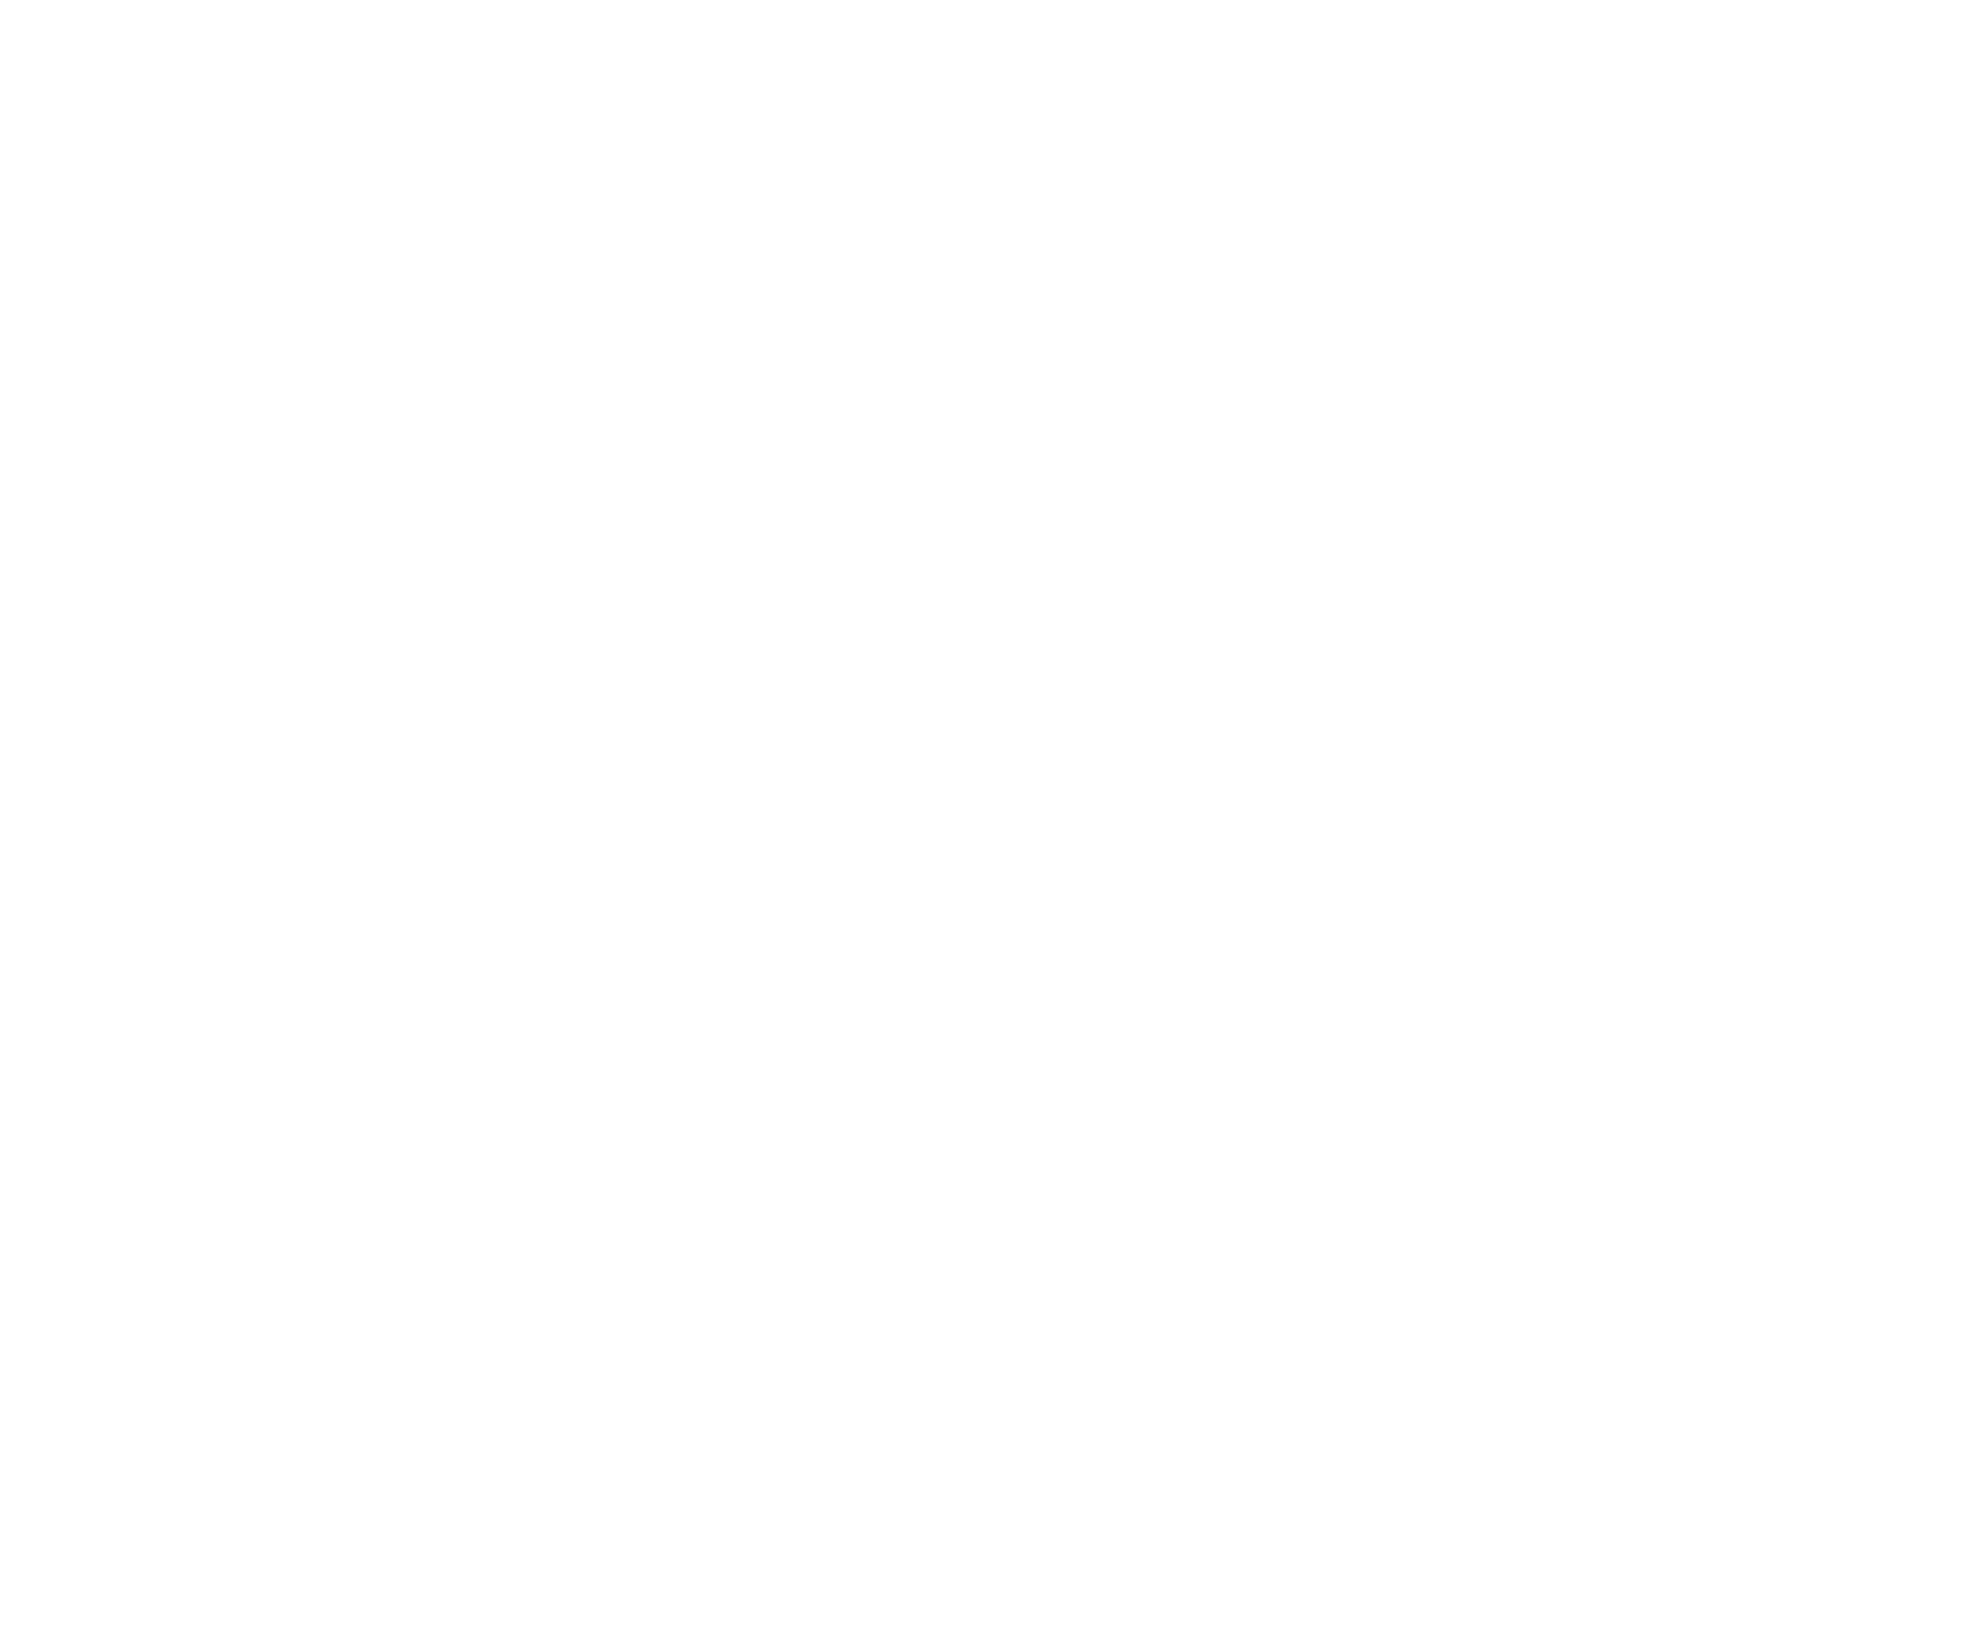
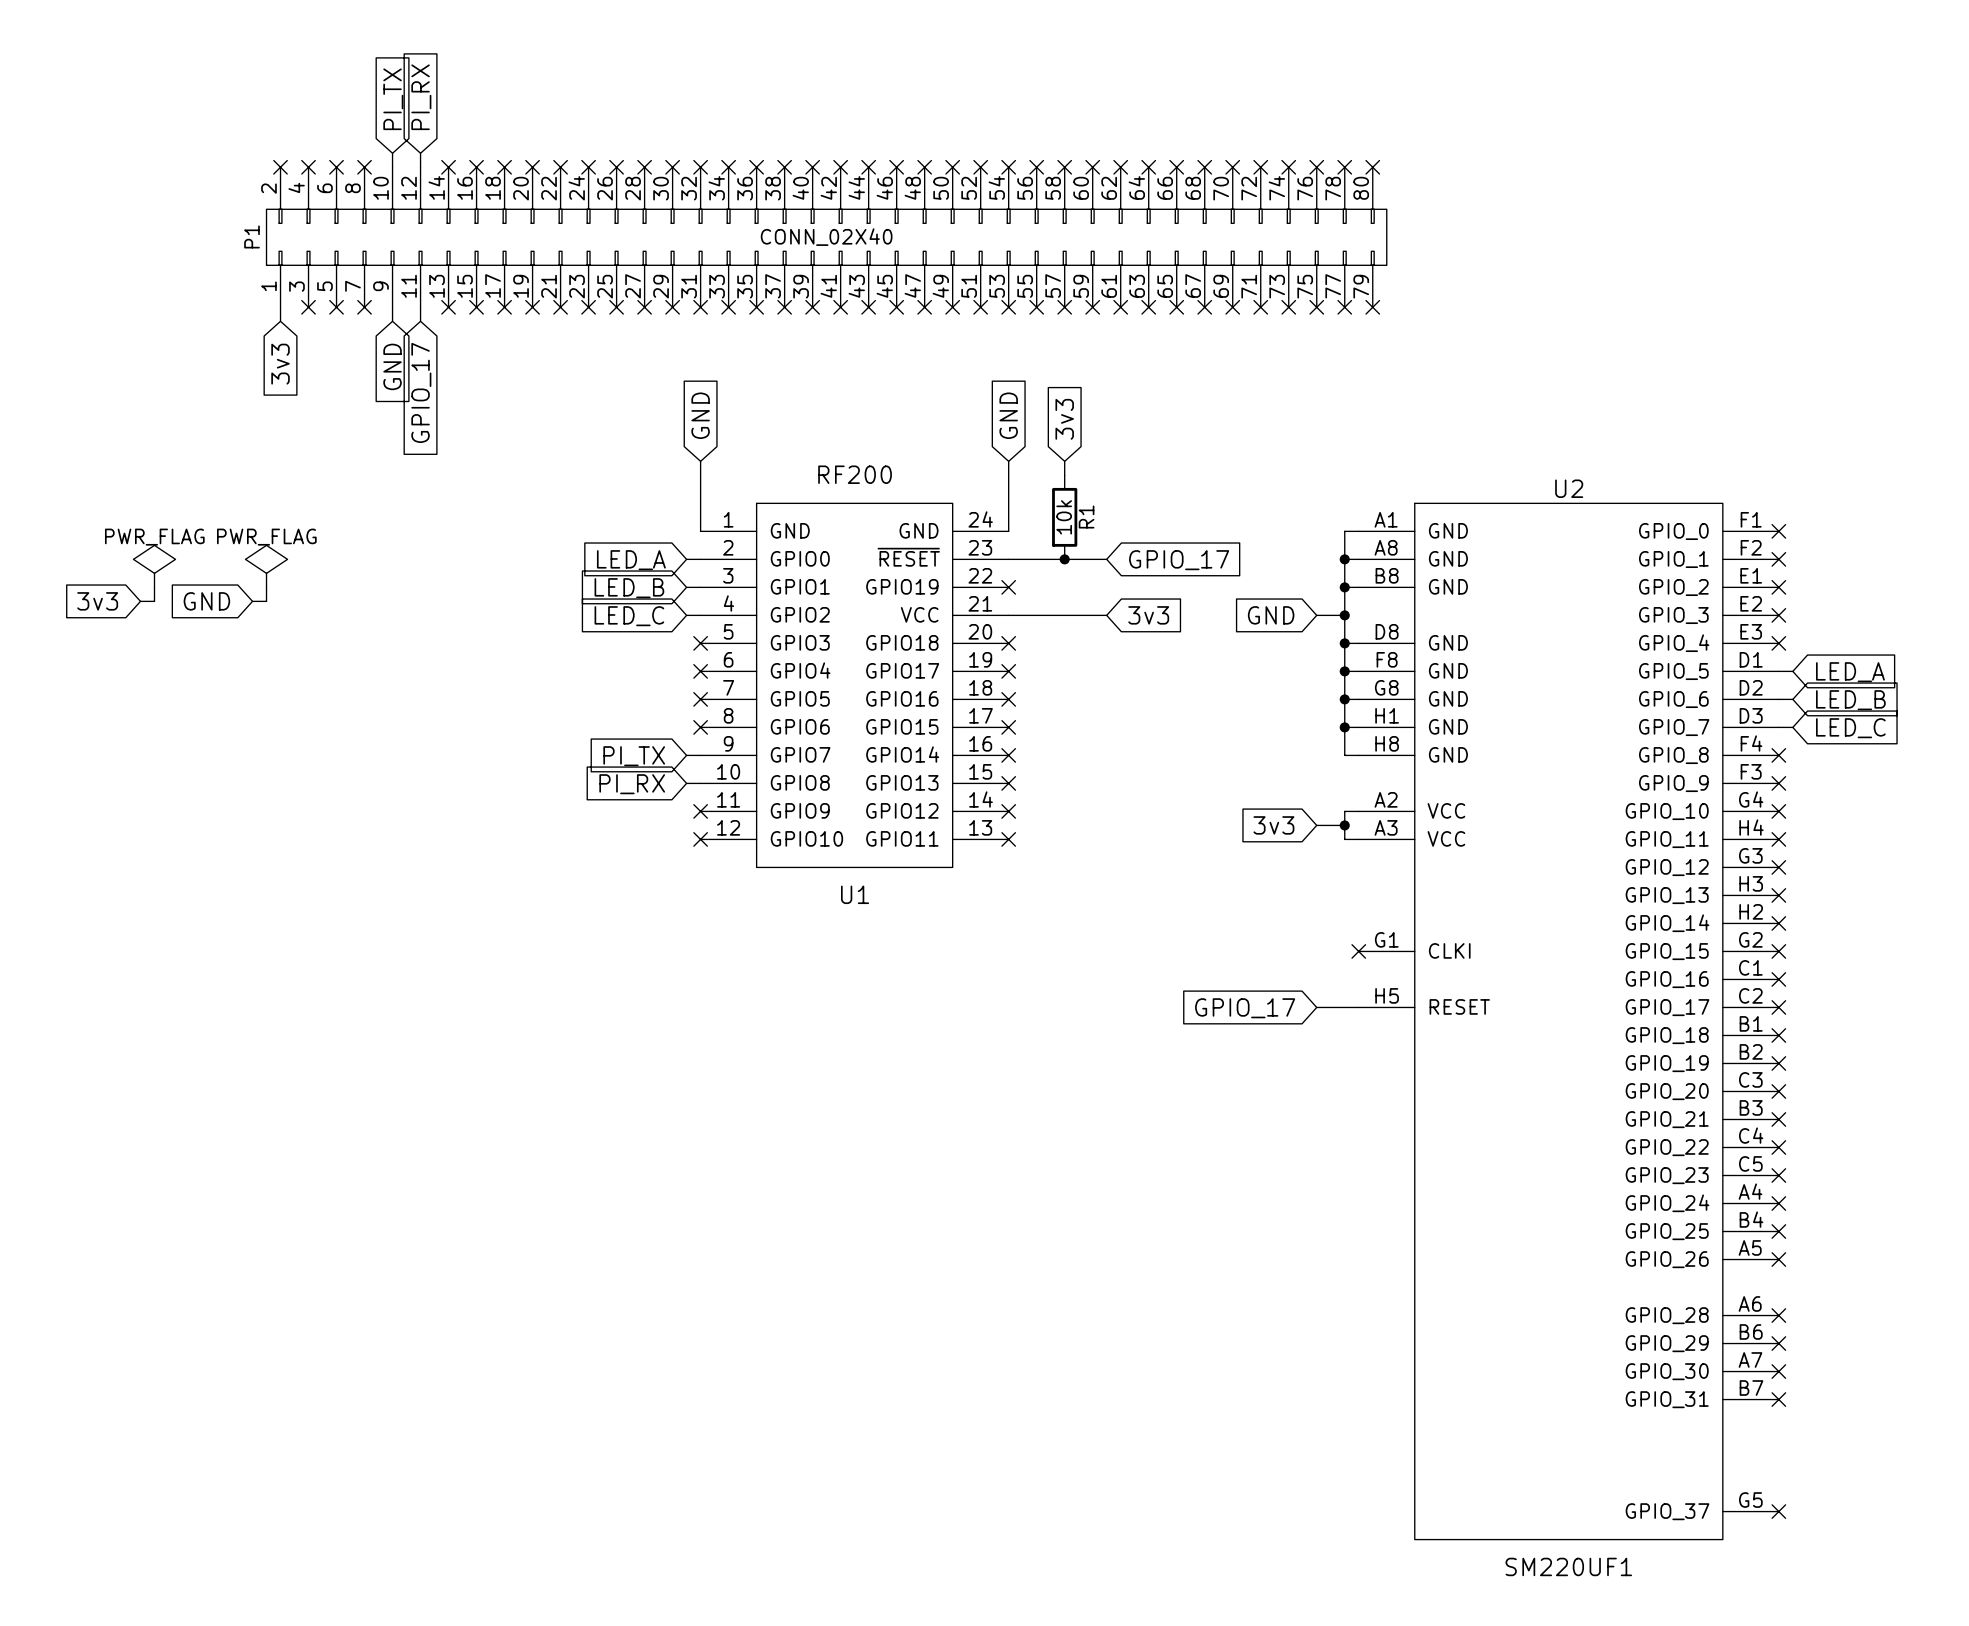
global label: none -> PI_RX (421, 97)
global label: none -> PI_TX (393, 99)
wire: none -> (392, 153) (392, 167)
wire: none -> (420, 153) (420, 167)
no-connect mark: none -> (280, 167)
no-connect mark: none -> (308, 167)
no-connect mark: none -> (336, 167)
no-connect mark: none -> (364, 167)
no-connect mark: none -> (448, 167)
no-connect mark: none -> (476, 167)
no-connect mark: none -> (504, 167)
no-connect mark: none -> (532, 167)
no-connect mark: none -> (560, 167)
no-connect mark: none -> (588, 167)
no-connect mark: none -> (616, 167)
no-connect mark: none -> (644, 167)
no-connect mark: none -> (672, 167)
no-connect mark: none -> (700, 167)
no-connect mark: none -> (728, 167)
no-connect mark: none -> (756, 167)
no-connect mark: none -> (784, 167)
no-connect mark: none -> (812, 167)
no-connect mark: none -> (840, 167)
no-connect mark: none -> (868, 167)
no-connect mark: none -> (896, 167)
no-connect mark: none -> (924, 167)
no-connect mark: none -> (952, 167)
no-connect mark: none -> (980, 167)
no-connect mark: none -> (1008, 167)
no-connect mark: none -> (1036, 167)
no-connect mark: none -> (1064, 167)
no-connect mark: none -> (1092, 167)
no-connect mark: none -> (1120, 167)
no-connect mark: none -> (1148, 167)
no-connect mark: none -> (1176, 167)
no-connect mark: none -> (1204, 167)
no-connect mark: none -> (1232, 167)
no-connect mark: none -> (1260, 167)
no-connect mark: none -> (1288, 167)
no-connect mark: none -> (1316, 167)
no-connect mark: none -> (1344, 167)
no-connect mark: none -> (1372, 167)
P1: none -> CONN_02X40 (826, 237)
wire: none -> (280, 307) (280, 321)
no-connect mark: none -> (308, 307)
no-connect mark: none -> (336, 307)
no-connect mark: none -> (364, 307)
wire: none -> (392, 307) (392, 321)
wire: none -> (420, 307) (420, 321)
no-connect mark: none -> (448, 307)
no-connect mark: none -> (476, 307)
no-connect mark: none -> (504, 307)
no-connect mark: none -> (532, 307)
no-connect mark: none -> (560, 307)
no-connect mark: none -> (588, 307)
no-connect mark: none -> (616, 307)
no-connect mark: none -> (644, 307)
no-connect mark: none -> (672, 307)
no-connect mark: none -> (700, 307)
no-connect mark: none -> (728, 307)
no-connect mark: none -> (756, 307)
no-connect mark: none -> (784, 307)
no-connect mark: none -> (812, 307)
no-connect mark: none -> (840, 307)
no-connect mark: none -> (868, 307)
no-connect mark: none -> (896, 307)
no-connect mark: none -> (924, 307)
no-connect mark: none -> (952, 307)
no-connect mark: none -> (980, 307)
no-connect mark: none -> (1008, 307)
no-connect mark: none -> (1036, 307)
no-connect mark: none -> (1064, 307)
no-connect mark: none -> (1092, 307)
no-connect mark: none -> (1120, 307)
no-connect mark: none -> (1148, 307)
no-connect mark: none -> (1176, 307)
no-connect mark: none -> (1204, 307)
no-connect mark: none -> (1232, 307)
no-connect mark: none -> (1260, 307)
no-connect mark: none -> (1288, 307)
no-connect mark: none -> (1316, 307)
no-connect mark: none -> (1344, 307)
no-connect mark: none -> (1372, 307)
global label: none -> 3v3 (280, 364)
global label: none -> GND (392, 366)
global label: none -> GPIO_17 (421, 392)
global label: none -> GND (700, 415)
global label: none -> GND (1008, 415)
global label: none -> 3v3 (1064, 419)
wire: none -> (700, 461) (700, 531)
wire: none -> (1008, 461) (1008, 531)
wire: none -> (1064, 461) (1064, 475)
R1: none -> 10k (1064, 517)
wire: none -> (1358, 531) (1344, 531) (1344, 755) (1358, 755)
no-connect mark: none -> (1778, 531)
wire: none -> (686, 559) (700, 559)
wire: none -> (1008, 559) (1106, 559)
junction: none -> (1064, 559)
wire: none -> (1344, 559) (1358, 559)
junction: none -> (1344, 559)
no-connect mark: none -> (1778, 559)
global label: none -> LED_A (631, 560)
global label: none -> GPIO_17 (1179, 560)
power symbol: none -> PWR_FLAG (154, 566)
power symbol: none -> PWR_FLAG (266, 566)
wire: none -> (154, 587) (154, 601) (140, 601)
wire: none -> (266, 587) (266, 601) (252, 601)
wire: none -> (686, 587) (700, 587)
no-connect mark: none -> (1008, 587)
wire: none -> (1344, 587) (1358, 587)
junction: none -> (1344, 587)
no-connect mark: none -> (1778, 587)
global label: none -> LED_B (629, 588)
global label: none -> 3v3 (97, 601)
global label: none -> GND (206, 601)
wire: none -> (686, 615) (700, 615)
wire: none -> (1008, 615) (1106, 615)
global label: none -> 3v3 (1148, 615)
global label: none -> GND (1271, 615)
wire: none -> (1316, 615) (1344, 615)
junction: none -> (1344, 615)
no-connect mark: none -> (1778, 615)
global label: none -> LED_C (629, 616)
no-connect mark: none -> (700, 643)
no-connect mark: none -> (1008, 643)
wire: none -> (1344, 643) (1358, 643)
junction: none -> (1344, 643)
no-connect mark: none -> (1778, 643)
no-connect mark: none -> (700, 671)
no-connect mark: none -> (1008, 671)
wire: none -> (1344, 671) (1358, 671)
junction: none -> (1344, 671)
wire: none -> (1778, 671) (1792, 671)
global label: none -> LED_A (1850, 672)
U1: none -> RF200 (854, 685)
no-connect mark: none -> (700, 699)
no-connect mark: none -> (1008, 699)
wire: none -> (1344, 699) (1358, 699)
junction: none -> (1344, 699)
wire: none -> (1778, 699) (1792, 699)
global label: none -> LED_B (1850, 700)
no-connect mark: none -> (700, 727)
no-connect mark: none -> (1008, 727)
wire: none -> (1344, 727) (1358, 727)
junction: none -> (1344, 727)
wire: none -> (1778, 727) (1792, 727)
global label: none -> LED_C (1850, 728)
wire: none -> (686, 755) (700, 755)
no-connect mark: none -> (1008, 755)
no-connect mark: none -> (1778, 755)
global label: none -> PI_TX (634, 756)
wire: none -> (686, 783) (700, 783)
no-connect mark: none -> (1008, 783)
no-connect mark: none -> (1778, 783)
global label: none -> PI_RX (632, 784)
no-connect mark: none -> (700, 811)
no-connect mark: none -> (1008, 811)
wire: none -> (1358, 811) (1344, 811) (1344, 839) (1358, 839)
no-connect mark: none -> (1778, 811)
global label: none -> 3v3 (1273, 825)
wire: none -> (1316, 825) (1344, 825)
junction: none -> (1344, 825)
no-connect mark: none -> (700, 839)
no-connect mark: none -> (1008, 839)
no-connect mark: none -> (1778, 839)
no-connect mark: none -> (1778, 867)
no-connect mark: none -> (1778, 895)
no-connect mark: none -> (1778, 923)
no-connect mark: none -> (1358, 951)
no-connect mark: none -> (1778, 951)
no-connect mark: none -> (1778, 979)
wire: none -> (1316, 1007) (1358, 1007)
no-connect mark: none -> (1778, 1007)
global label: none -> GPIO_17 (1245, 1008)
U2: none -> SM220UF1 (1568, 1021)
no-connect mark: none -> (1778, 1035)
no-connect mark: none -> (1778, 1063)
no-connect mark: none -> (1778, 1091)
no-connect mark: none -> (1778, 1119)
no-connect mark: none -> (1778, 1147)
no-connect mark: none -> (1778, 1175)
no-connect mark: none -> (1778, 1203)
no-connect mark: none -> (1778, 1231)
no-connect mark: none -> (1778, 1259)
no-connect mark: none -> (1778, 1315)
no-connect mark: none -> (1778, 1343)
no-connect mark: none -> (1778, 1371)
no-connect mark: none -> (1778, 1399)
no-connect mark: none -> (1778, 1511)

